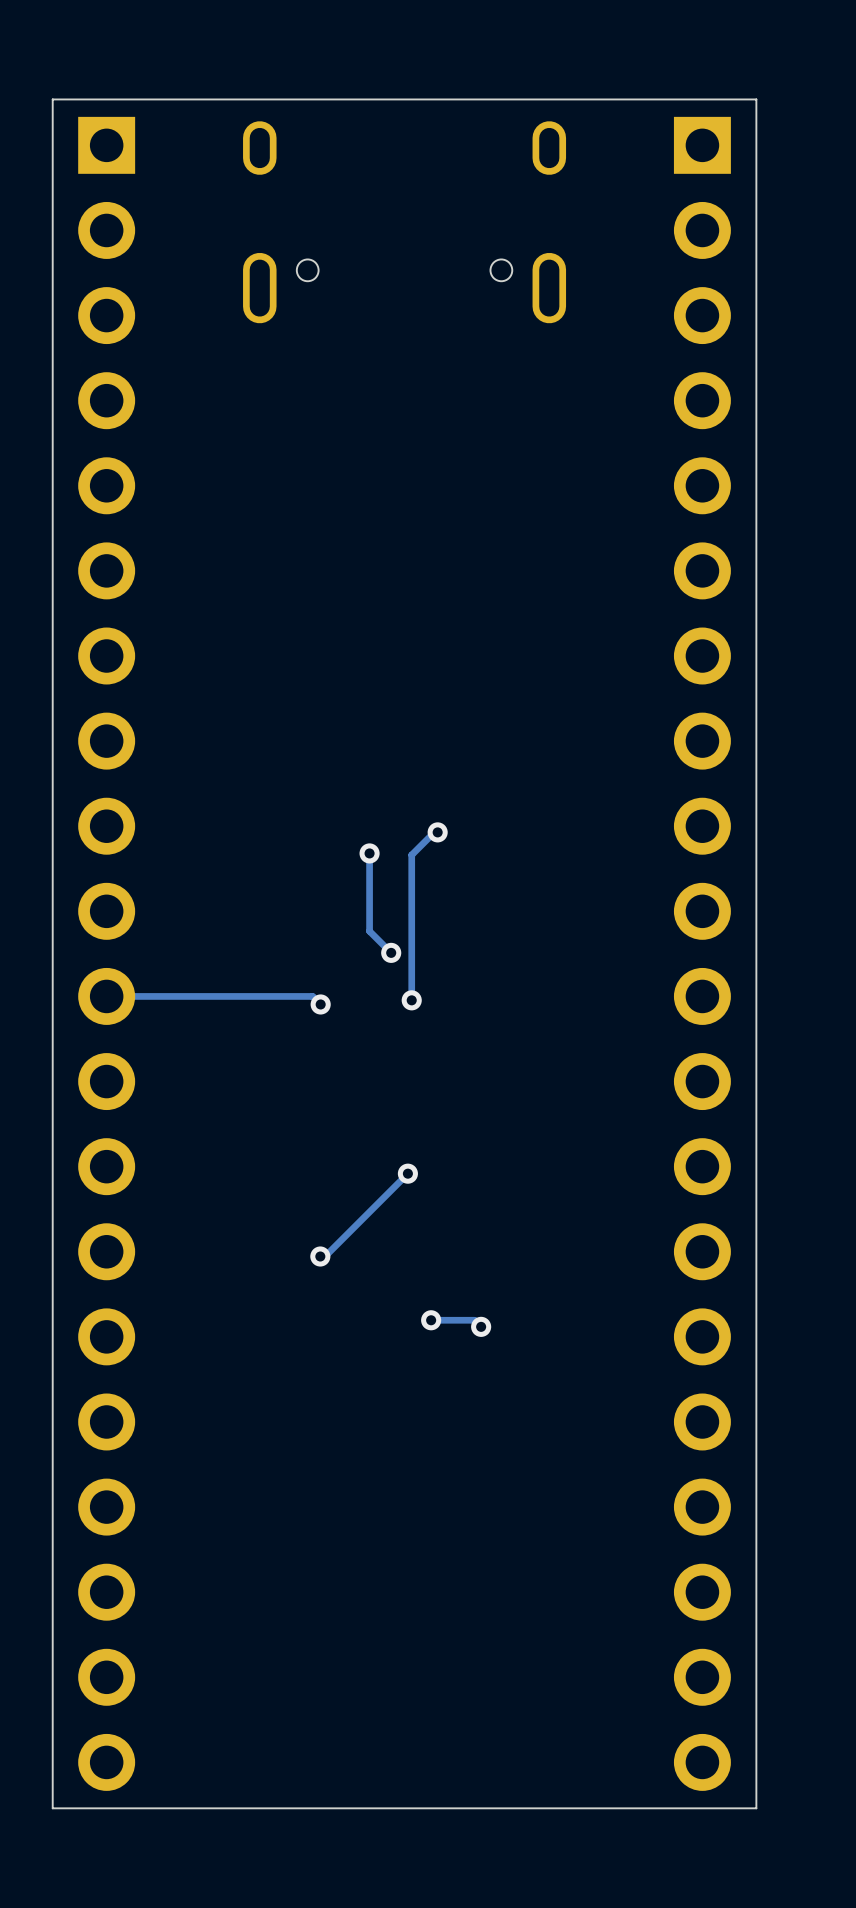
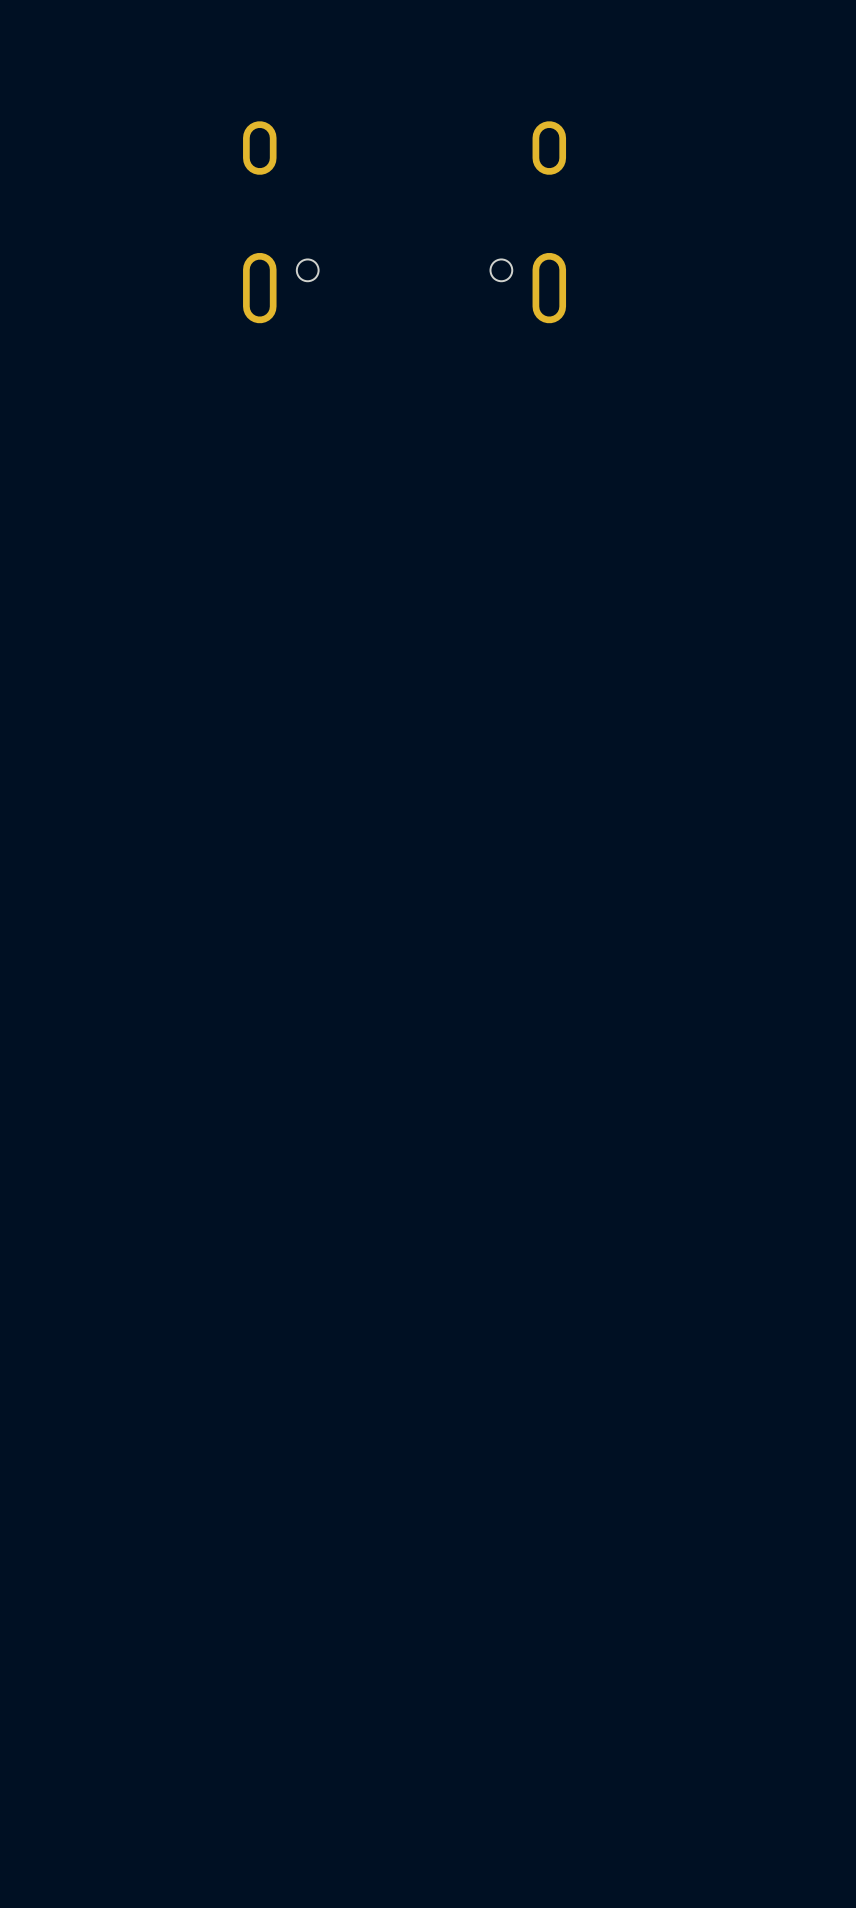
board edge: (756, 99) (52, 99) (52, 1808) (756, 1808) (756, 99) -> none
track: (437, 832) (434, 832) (411, 854) (411, 1000) -> none
via: (437, 832) -> none
track: (369, 853) (369, 931) (391, 952) -> none
via: (369, 853) -> none
via: (391, 952) -> none
part: (106, 953) -> none
part: (702, 953) -> none
track: (106, 996) (312, 996) (320, 1004) -> none
via: (411, 1000) -> none
via: (320, 1004) -> none
track: (407, 1173) (325, 1256) (320, 1256) -> none
via: (407, 1173) -> none
via: (320, 1256) -> none
track: (431, 1320) (474, 1320) (481, 1326) -> none
via: (431, 1320) -> none
via: (481, 1326) -> none

